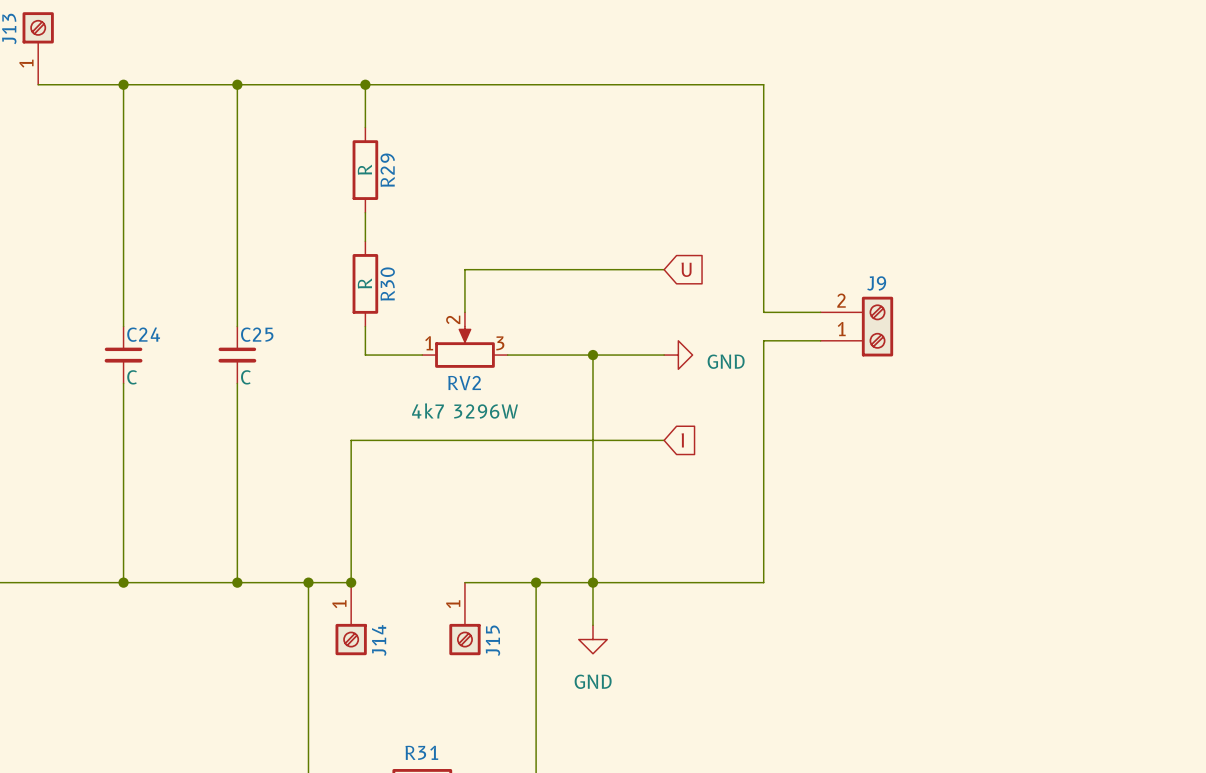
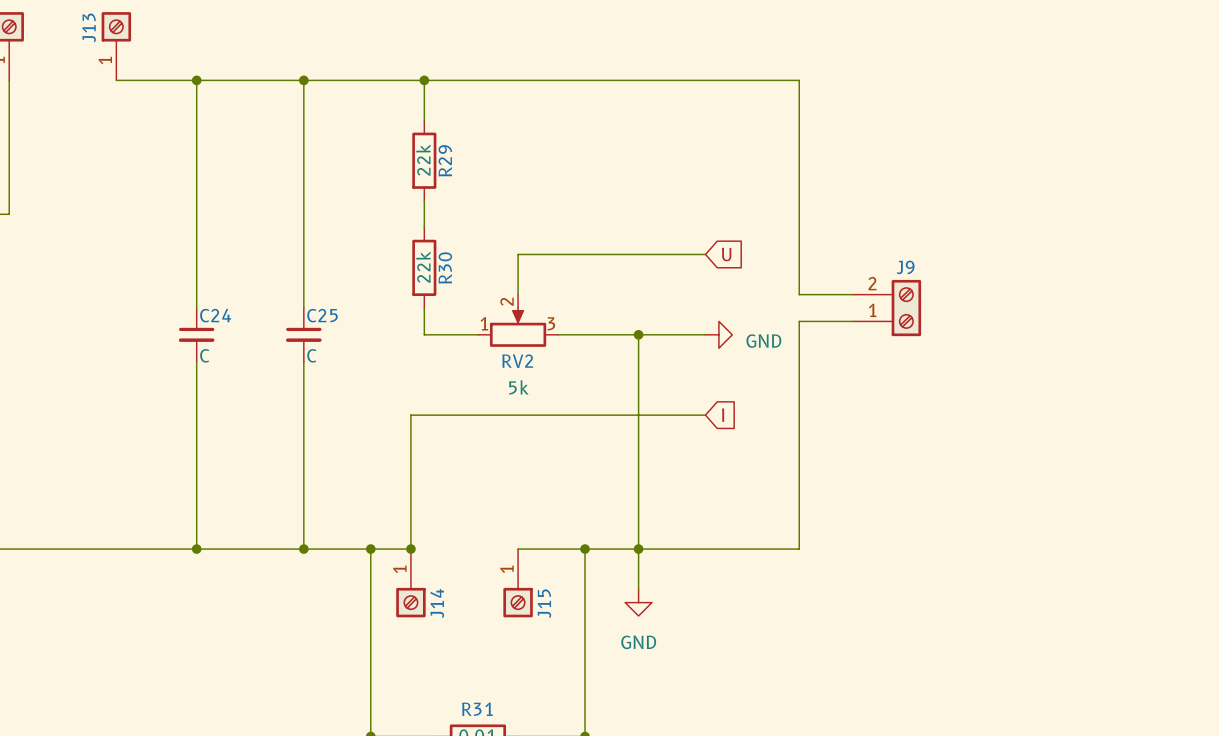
R29 value: R (364, 169) -> 22k (423, 160)
R30 value: R (364, 283) -> 22k (423, 267)
RV2 value: 4k7 3296W (465, 411) -> 5k (518, 387)

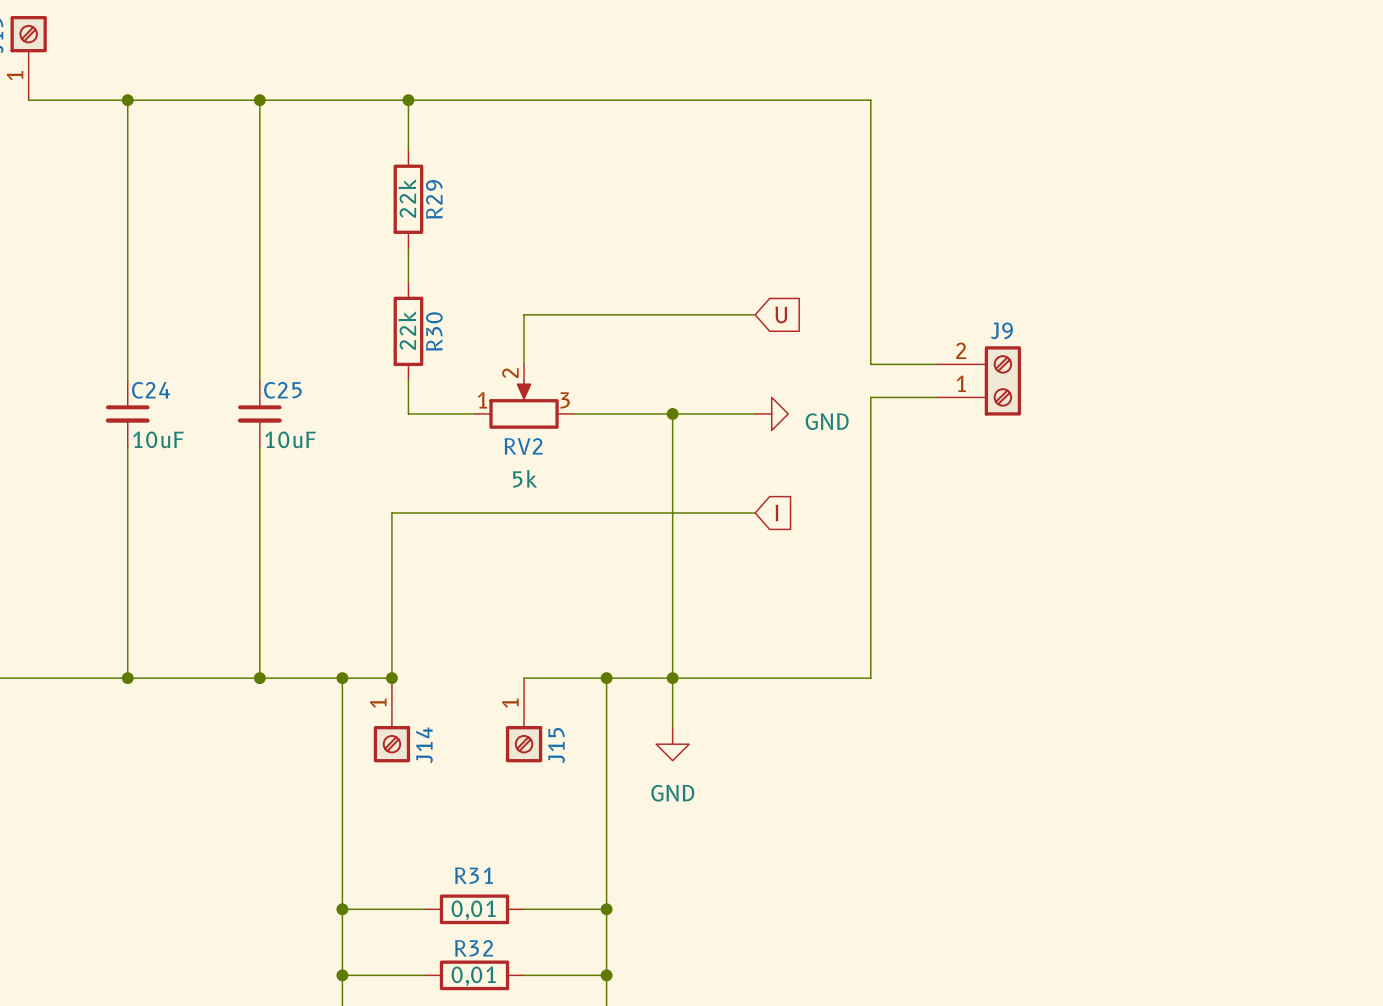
C24 value: C (204, 355) -> 10uF (158, 439)
C25 value: C (311, 355) -> 10uF (290, 439)

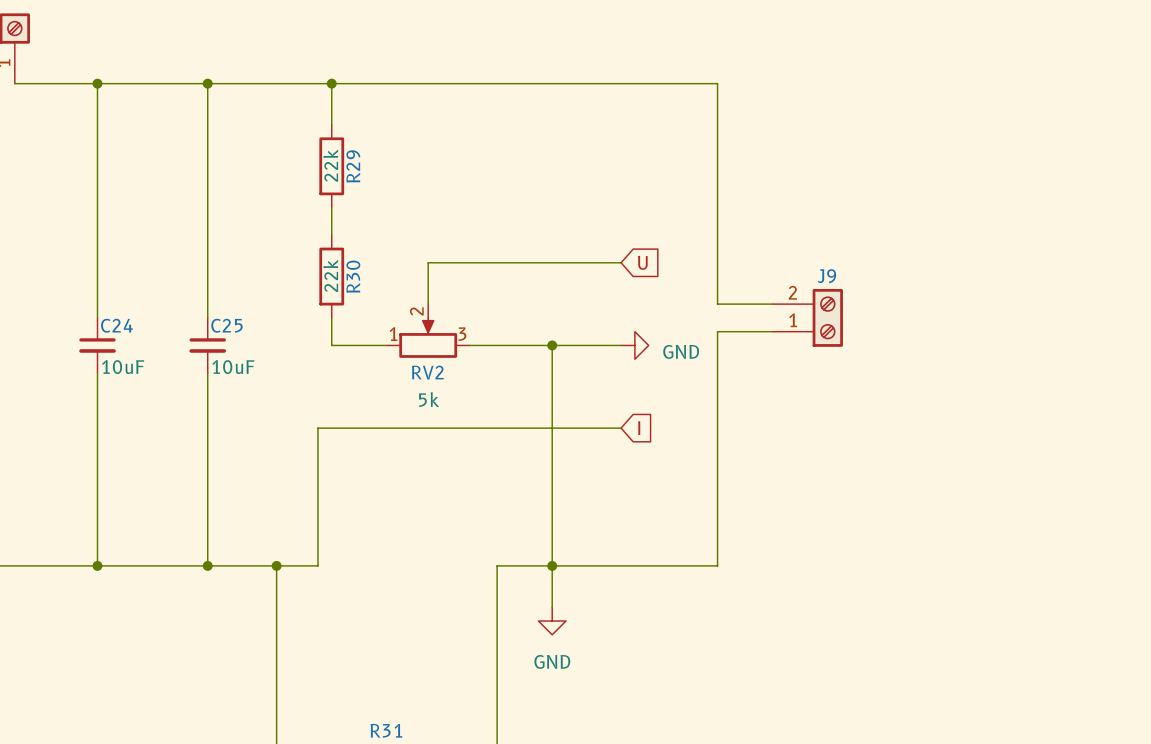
junction: (391, 678) -> none
wire: (524, 678) (606, 678) -> none
junction: (606, 678) -> none
J14: (391, 720) -> none
J15: (524, 720) -> none

